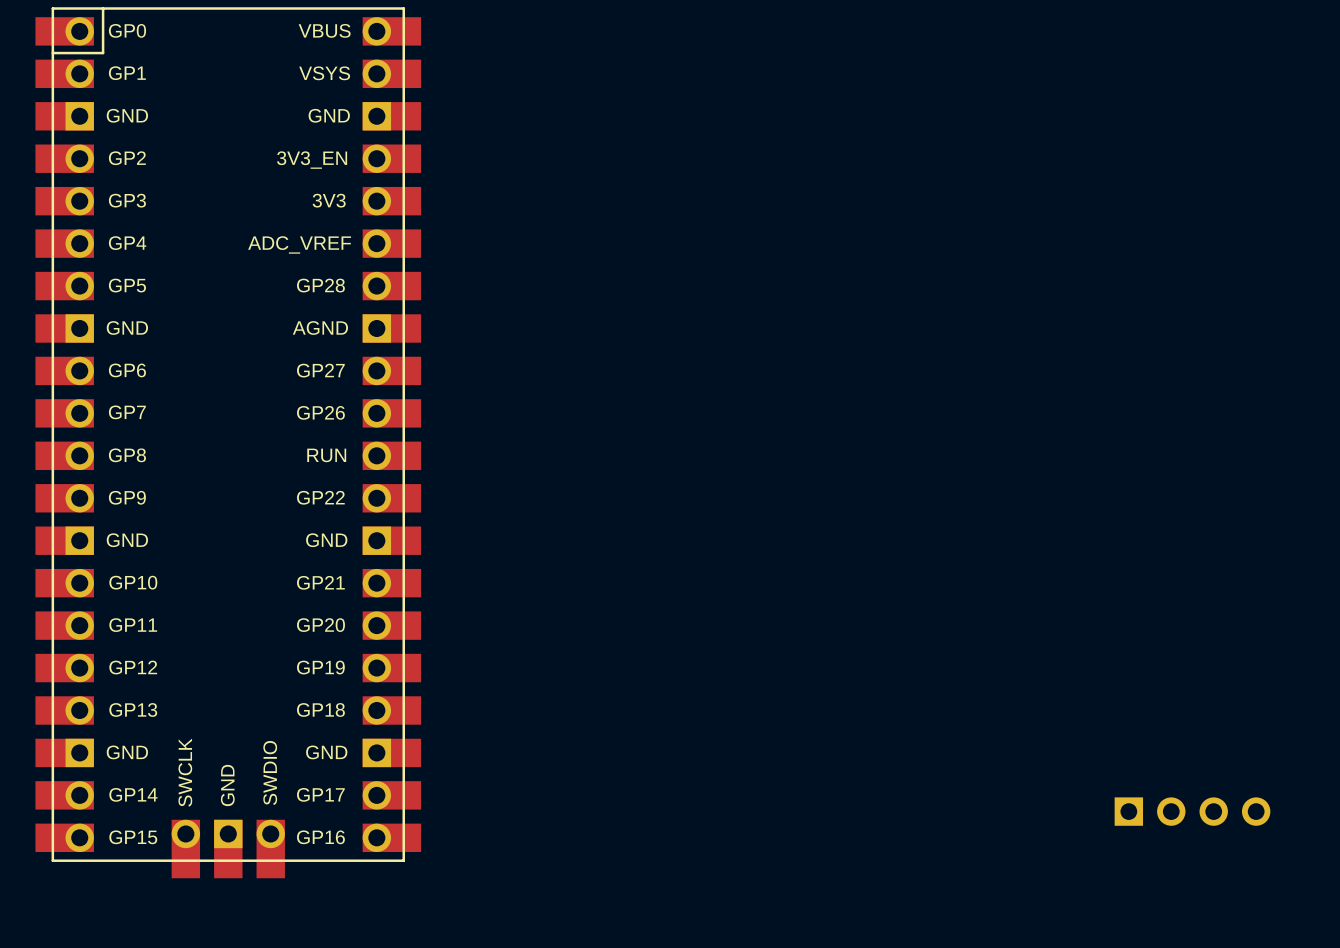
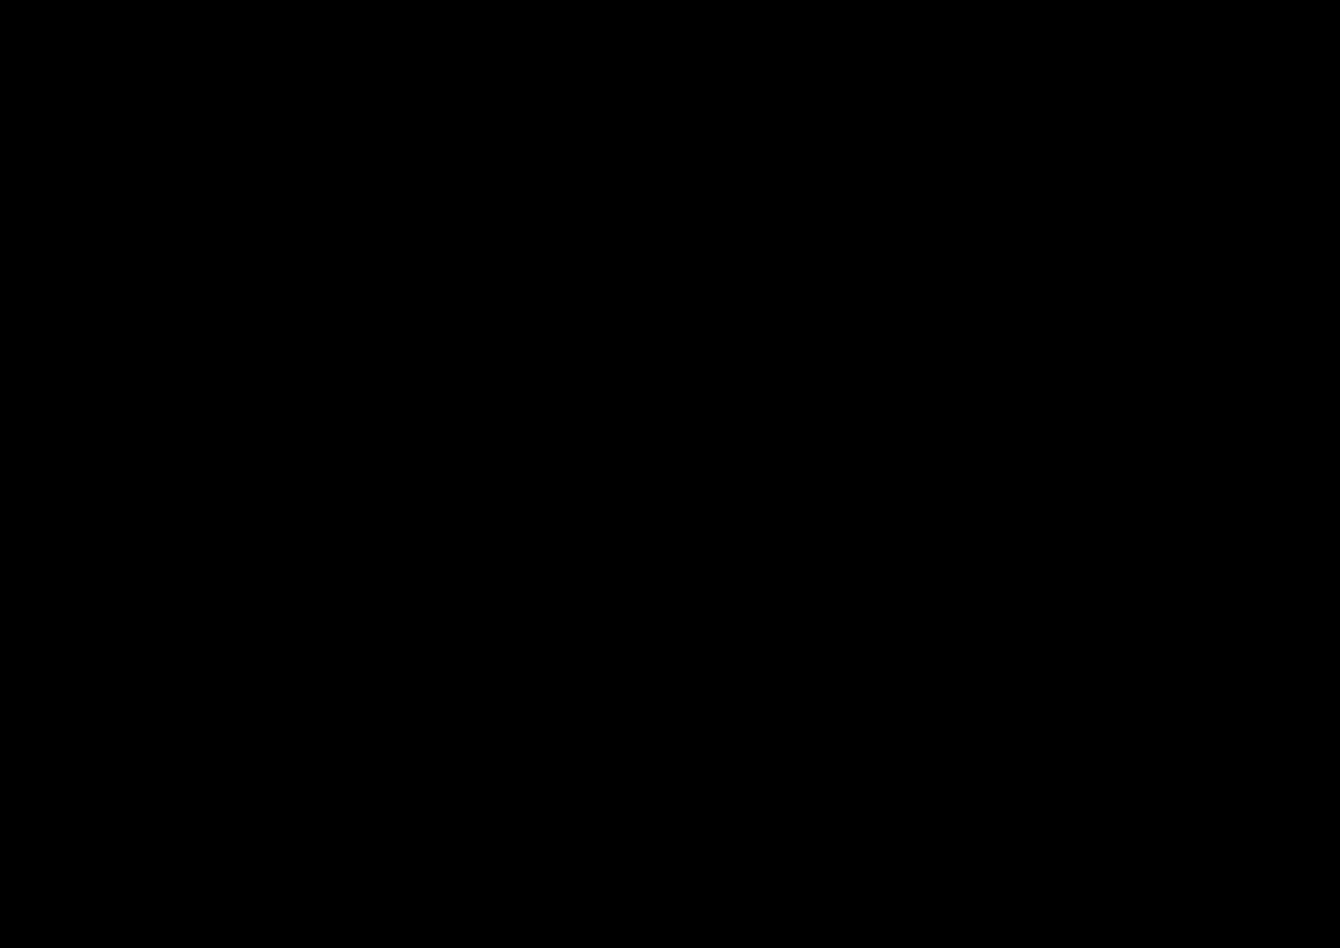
part: (228, 442) -> none
part: (1192, 811) -> none

